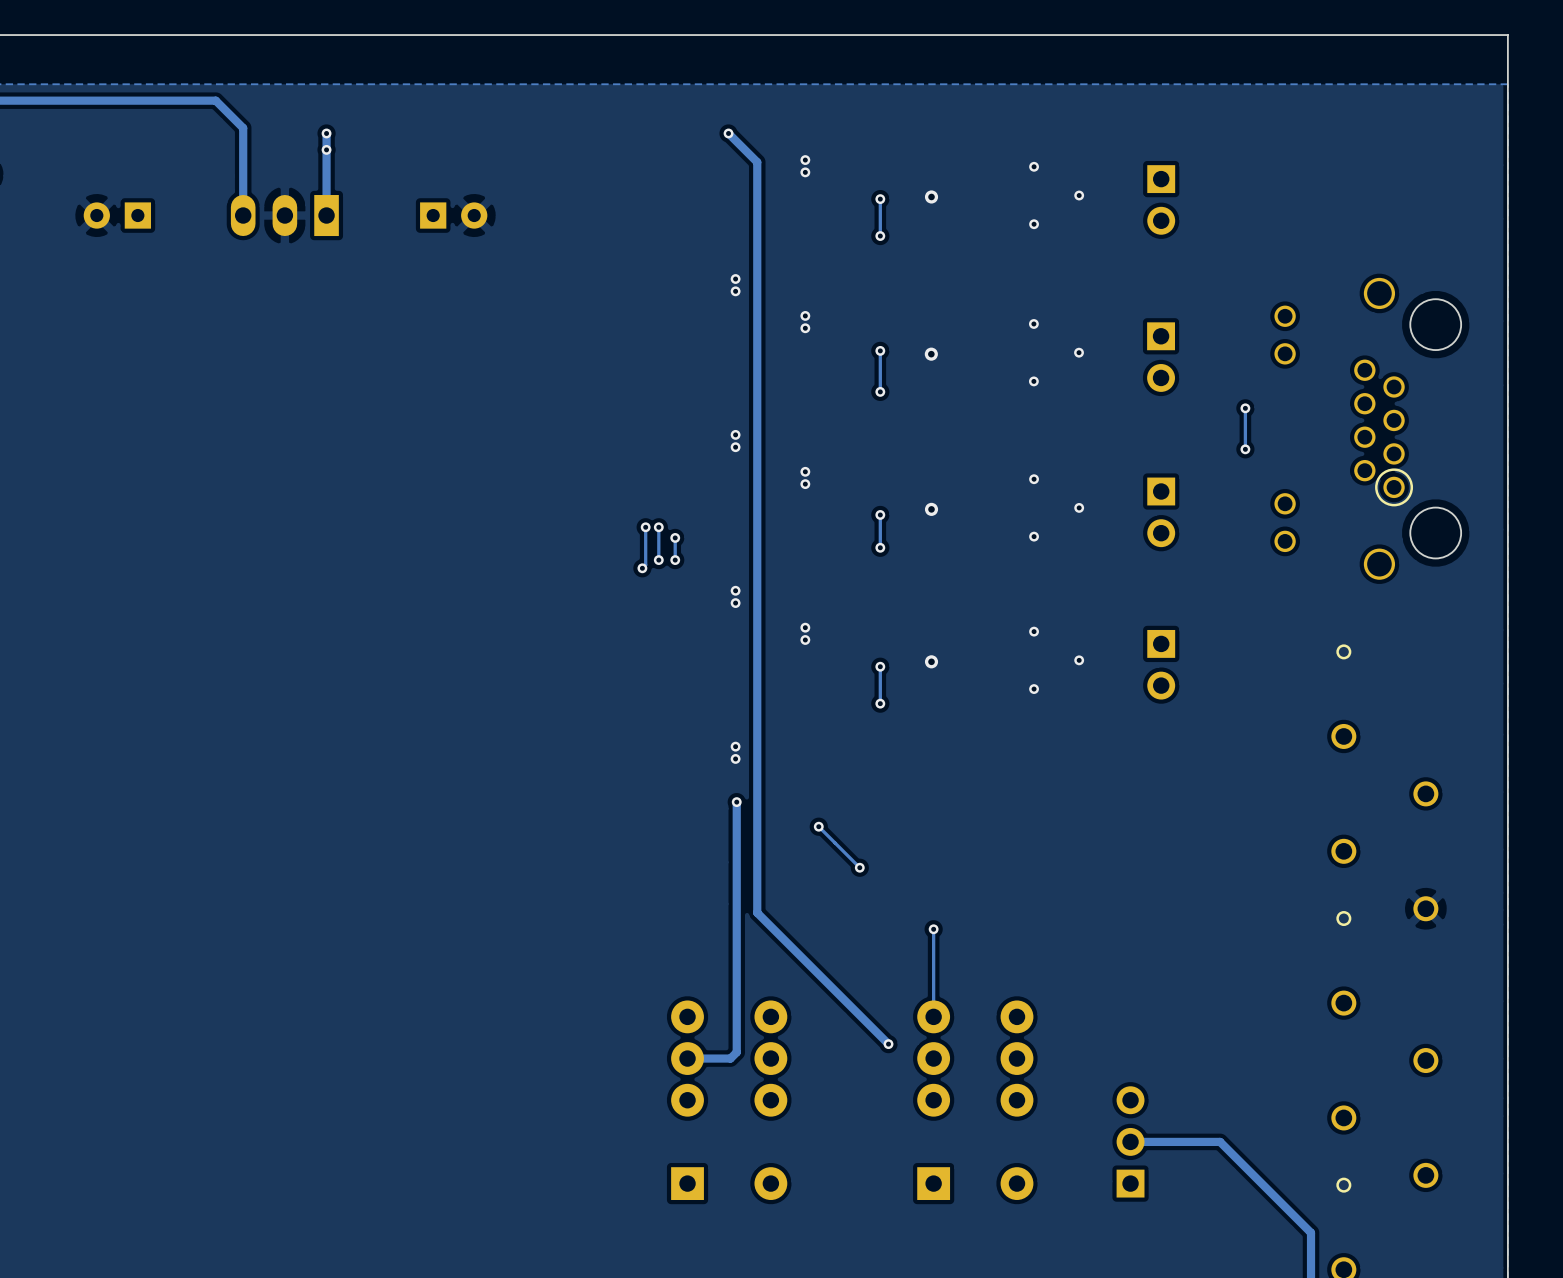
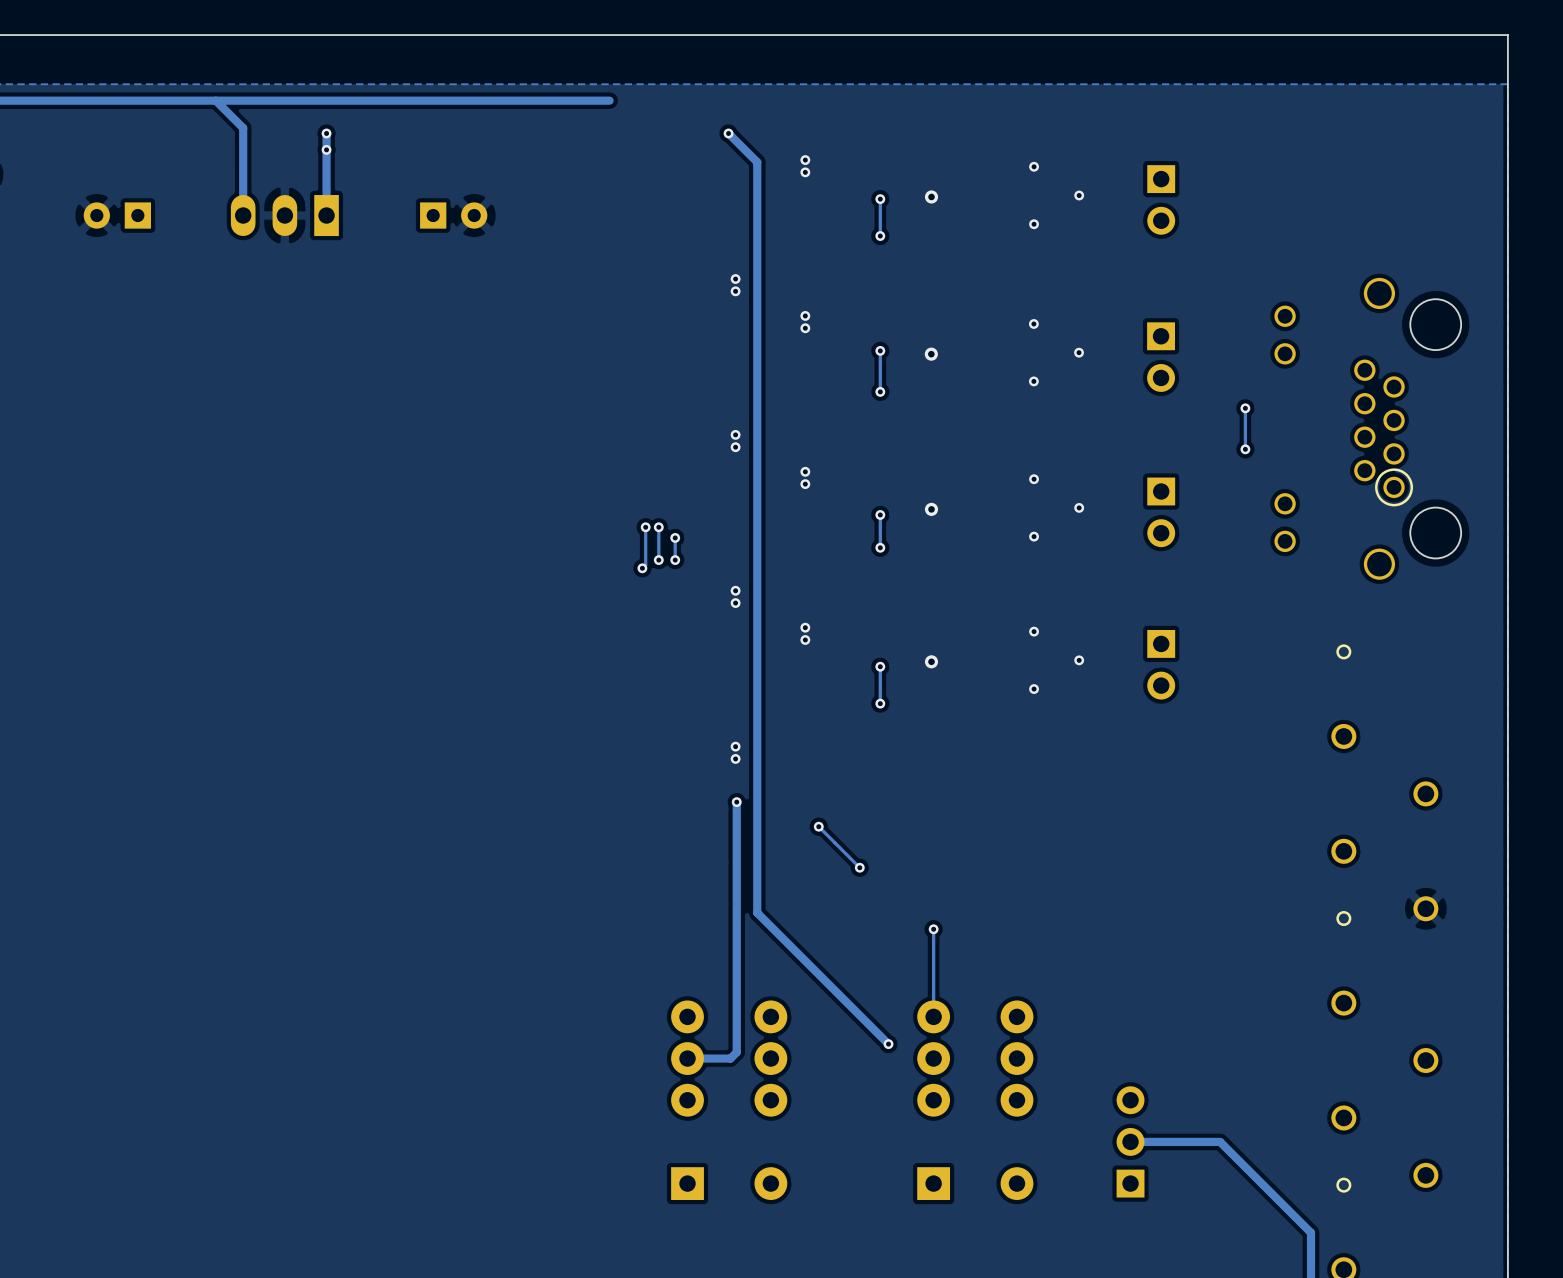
track: none -> (609, 100) (215, 100)

